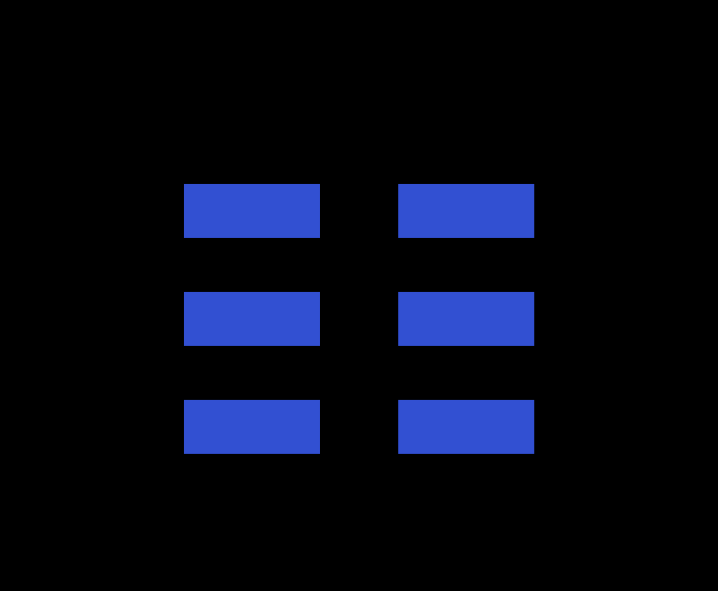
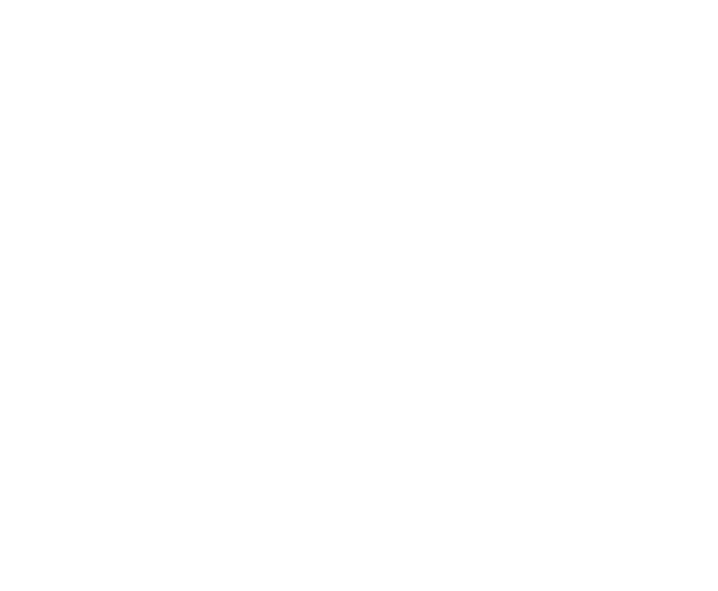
part: (359, 318) -> none

